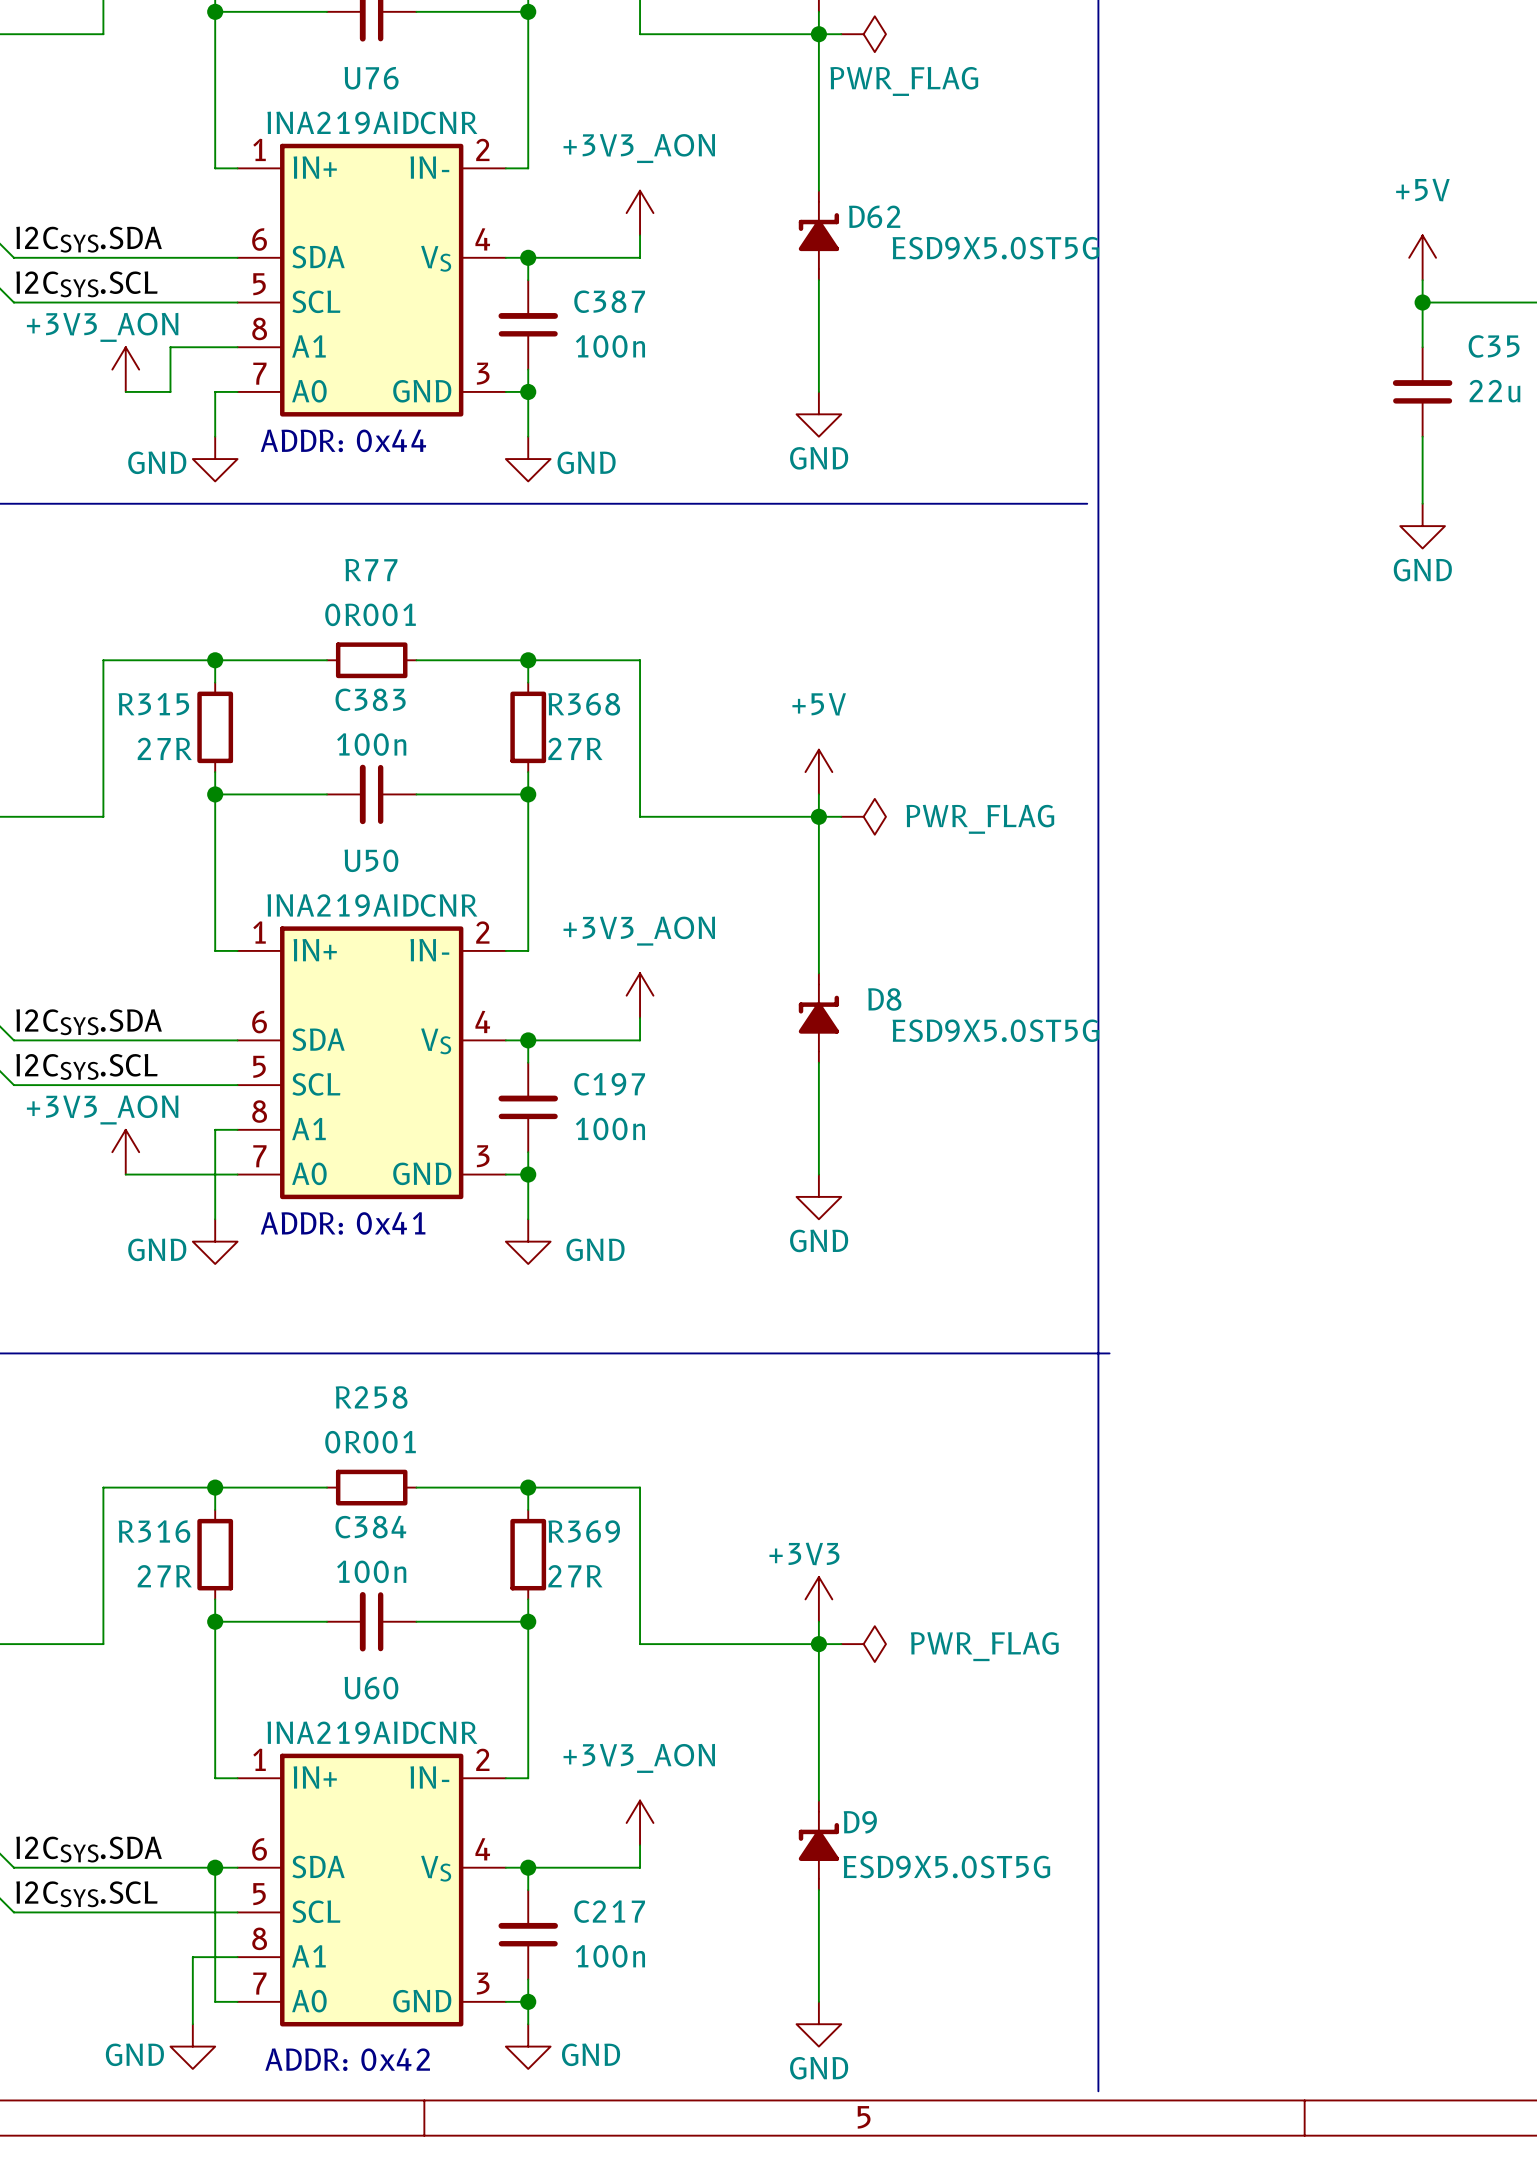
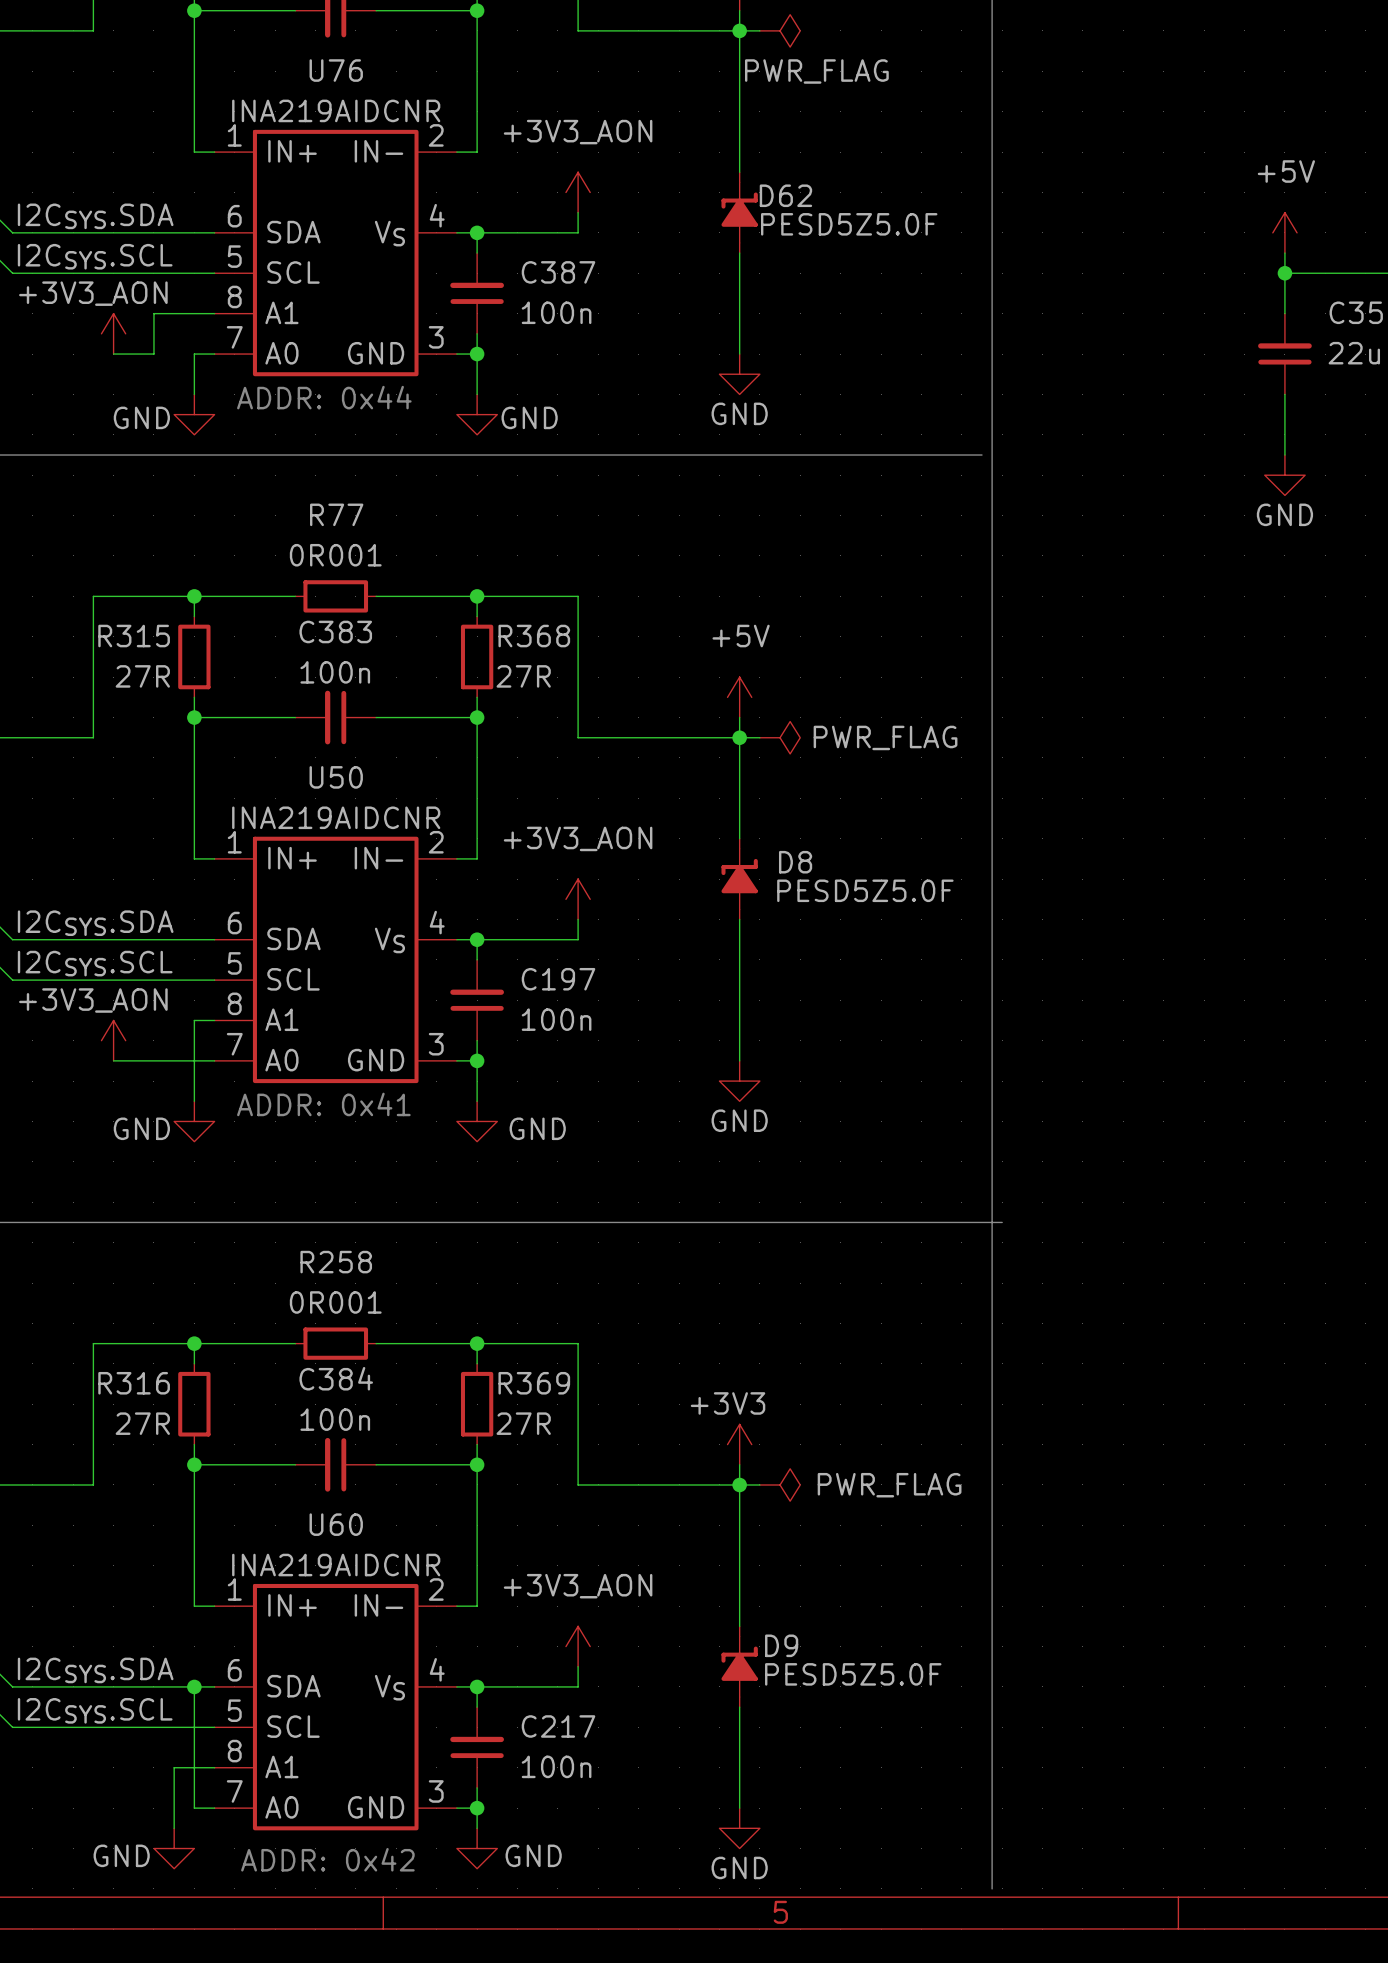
D62 text: ESD9X5.0ST5G (995, 248) -> PESD5Z5.0F (849, 224)
D8 position: (818, 1018) -> (739, 879)
D8 text: ESD9X5.0ST5G (995, 1030) -> PESD5Z5.0F (865, 890)
D9 text: ESD9X5.0ST5G (946, 1866) -> PESD5Z5.0F (853, 1674)

